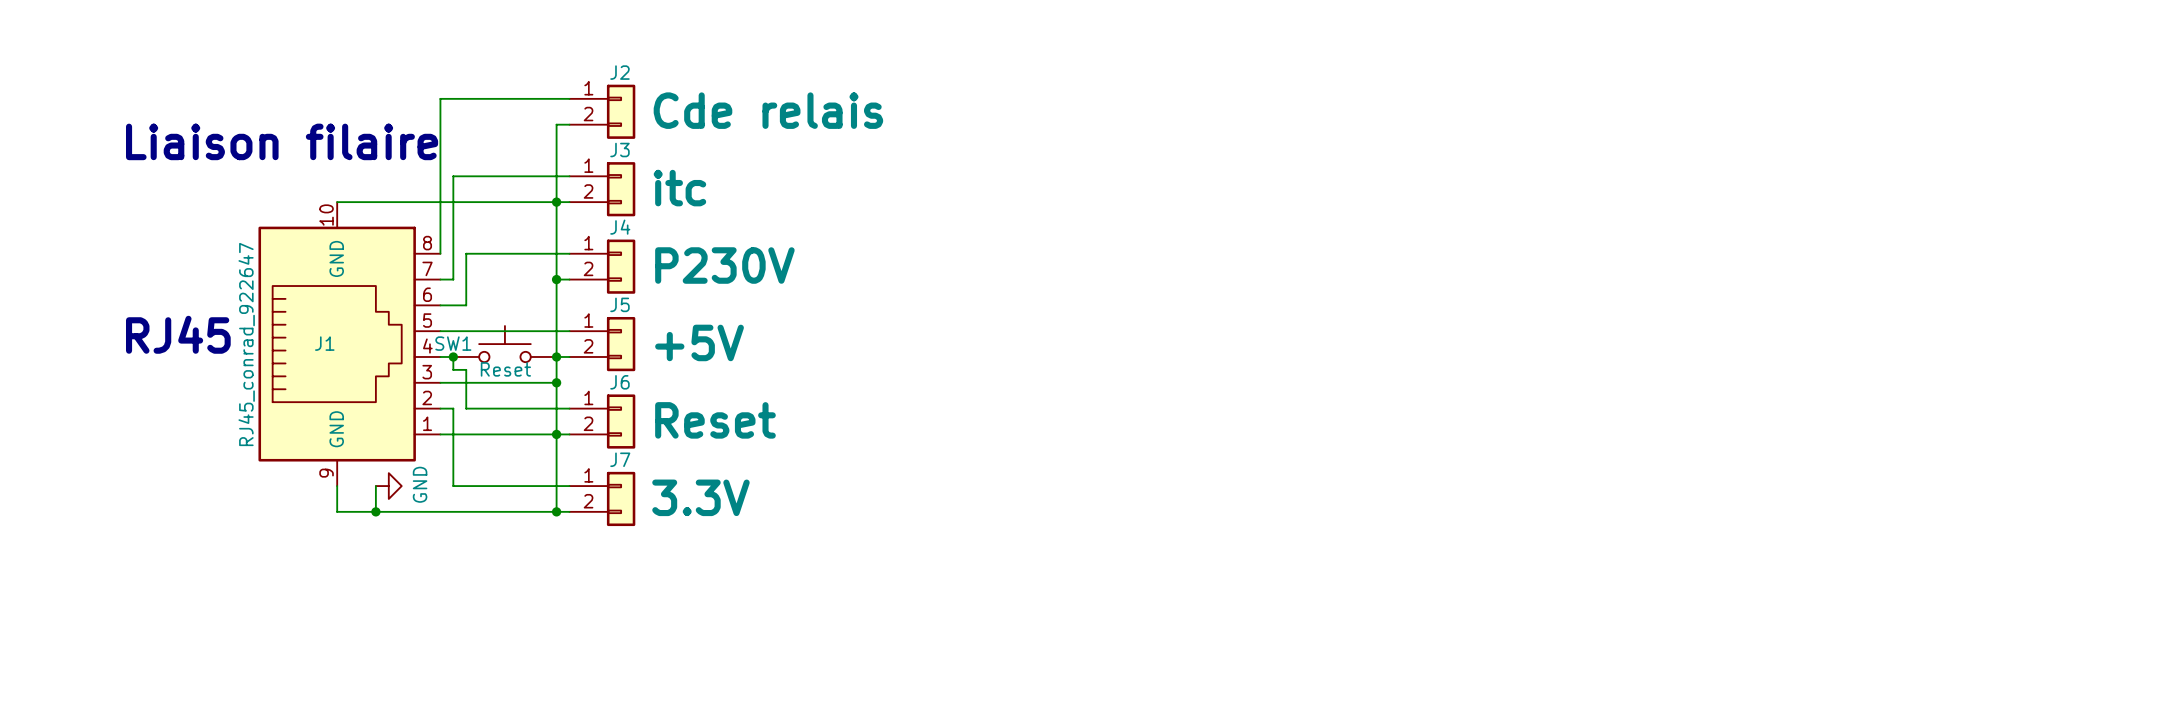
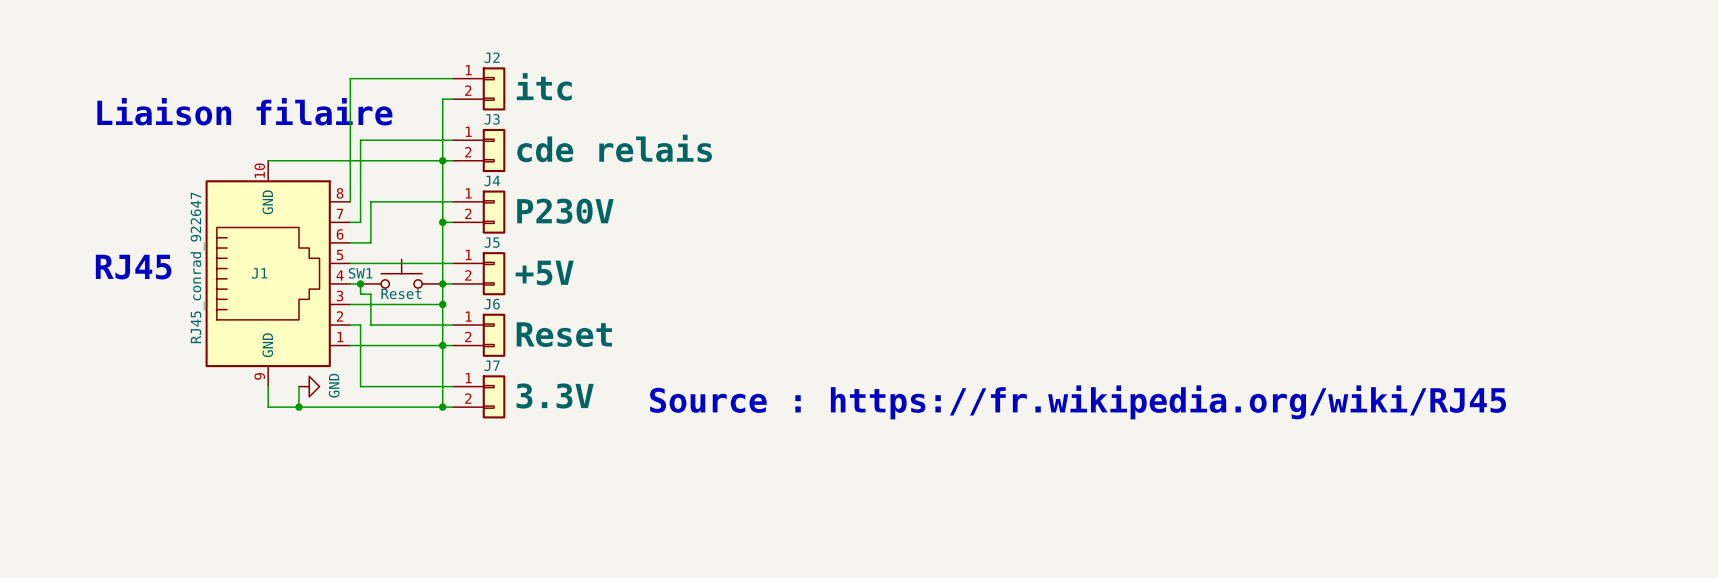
J2 value: Cde relais (768, 110) -> itc (544, 86)
J3 value: itc (679, 188) -> cde relais (614, 148)
text: none -> Source : https://fr.wikipedia.org/wiki/RJ45 (1078, 402)

